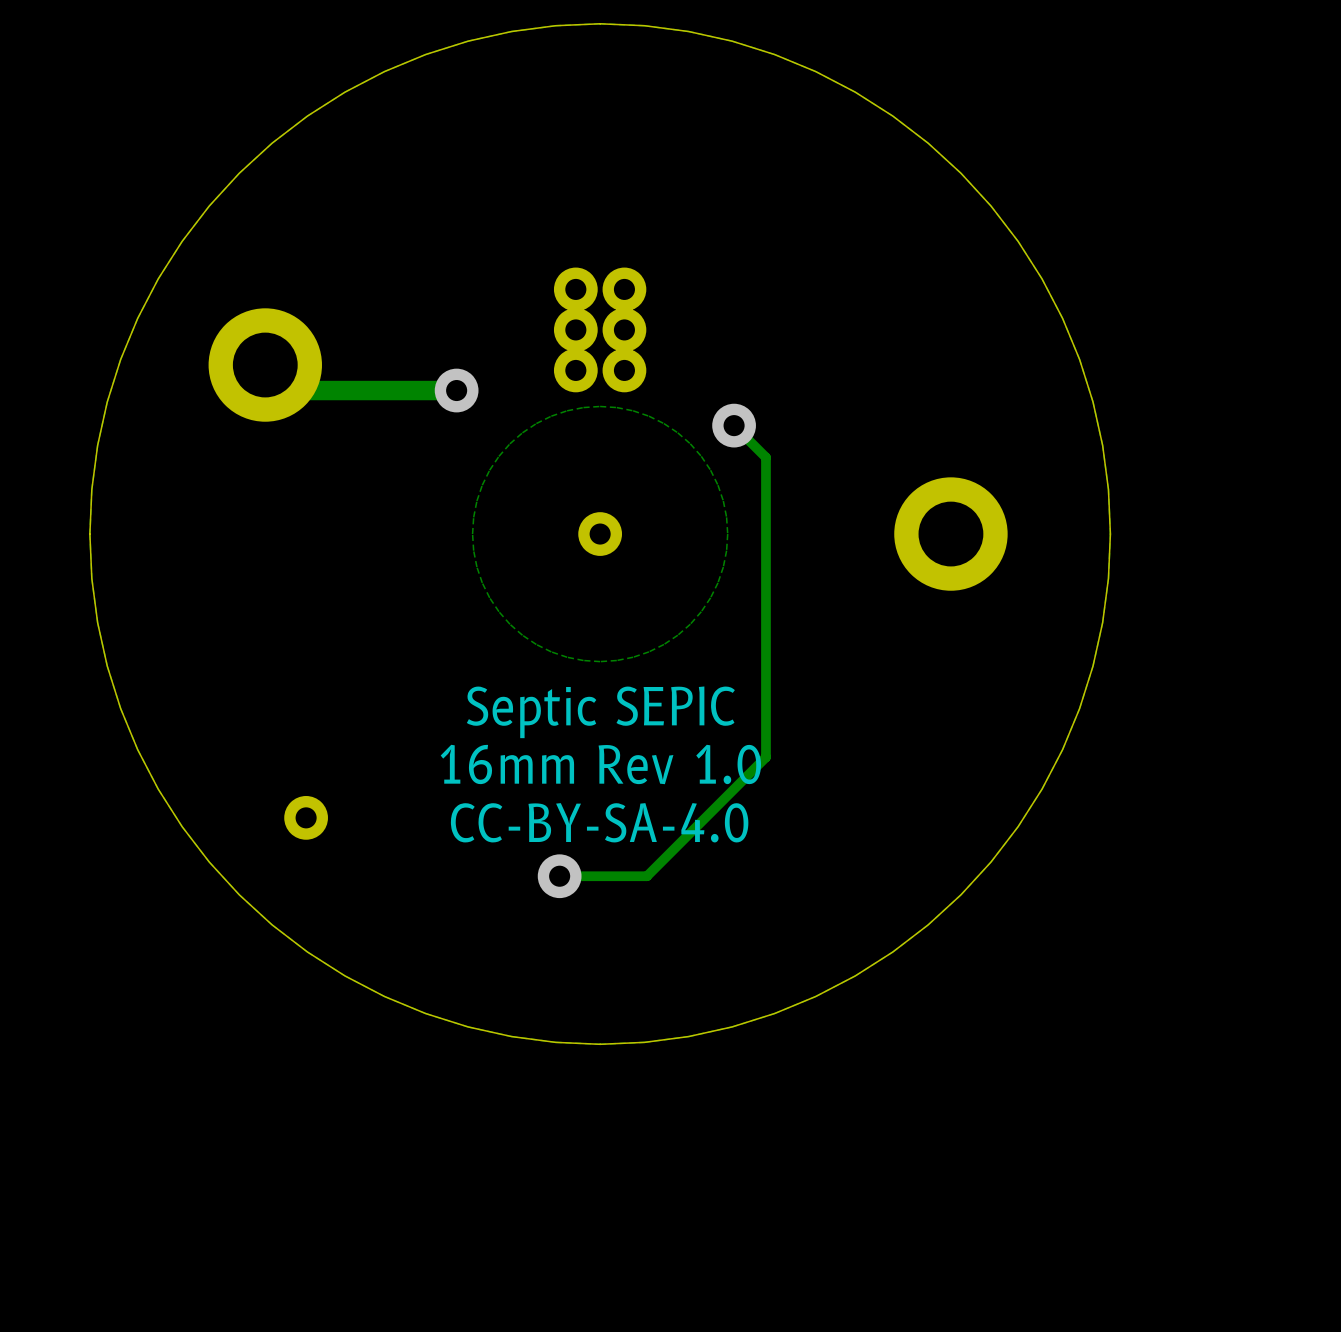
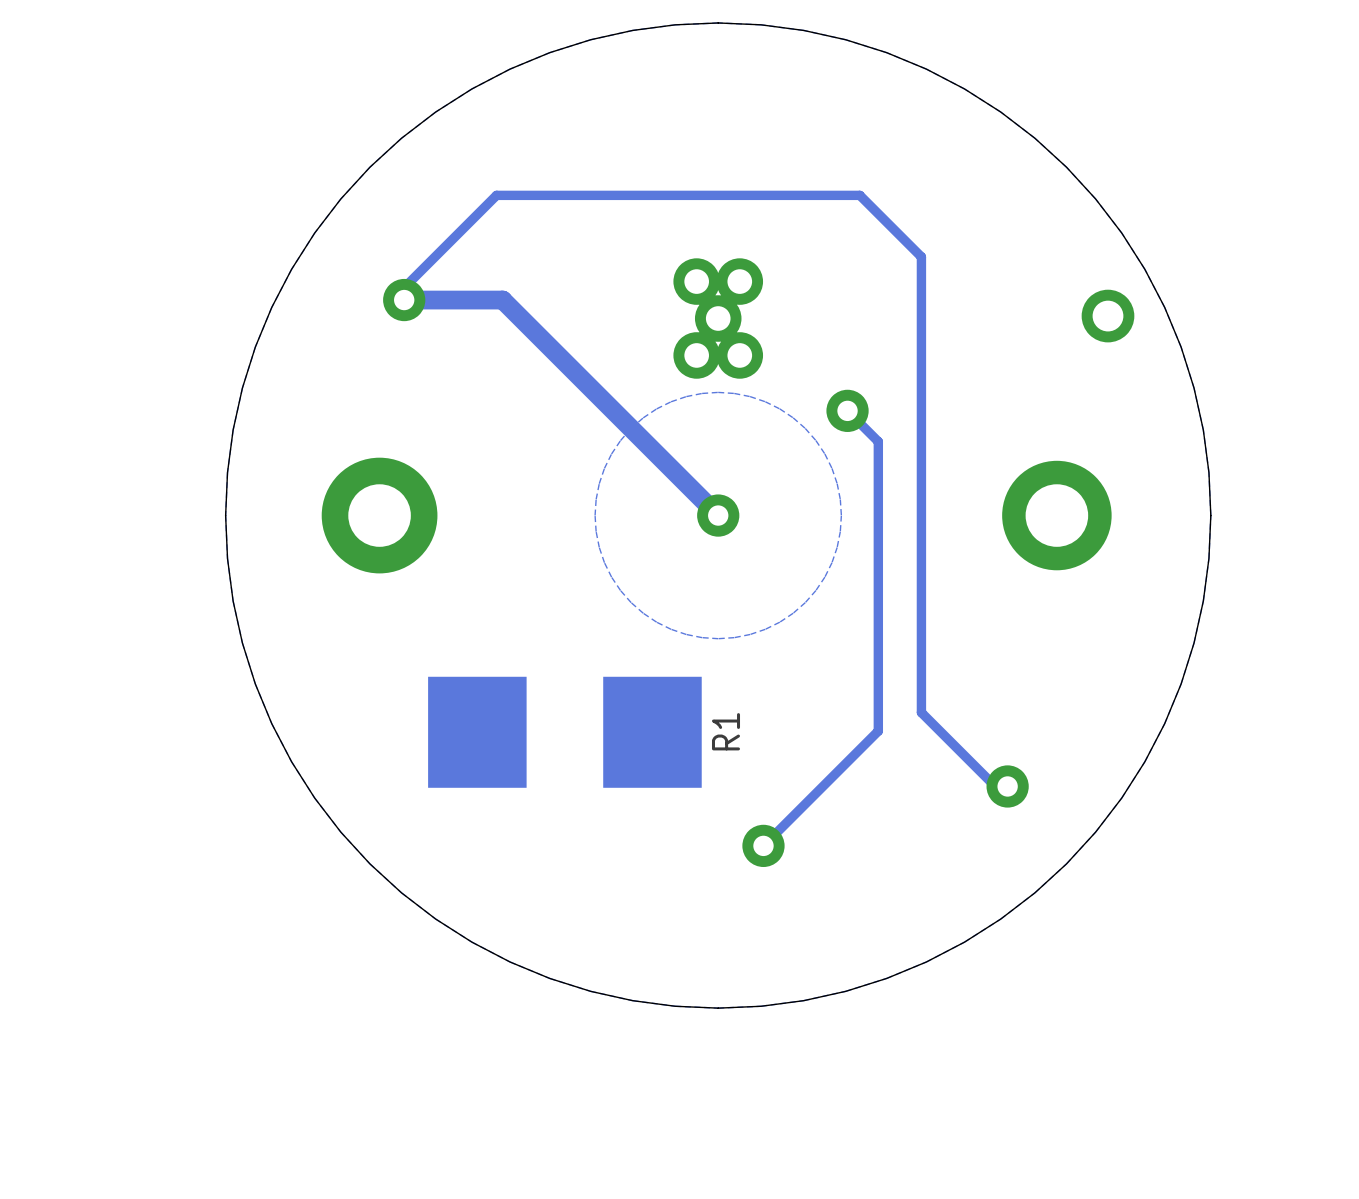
part footprint: [553, 267, 647, 393] -> [673, 258, 764, 379]
part: none -> (1107, 316)
track: (265, 365) (290, 390) (456, 390) -> none
part: (265, 365) -> none
via position: (456, 390) -> (404, 300)
part: none -> (379, 515)
track: none -> (718, 515) (502, 300) (404, 300) (404, 287) (496, 195) (859, 195) (921, 256) (921, 712) (995, 786) (1007, 786)
text: Septic SEPIC (600, 712) -> none
R1: none -> (564, 732)
text: 16mm Rev 1.0 (600, 764) -> none
via: none -> (1007, 786)
part: (306, 817) -> none
text: CC-BY-SA-4.0 (599, 822) -> none
via position: (559, 876) -> (763, 845)
track: (647, 876) (559, 876) -> none

